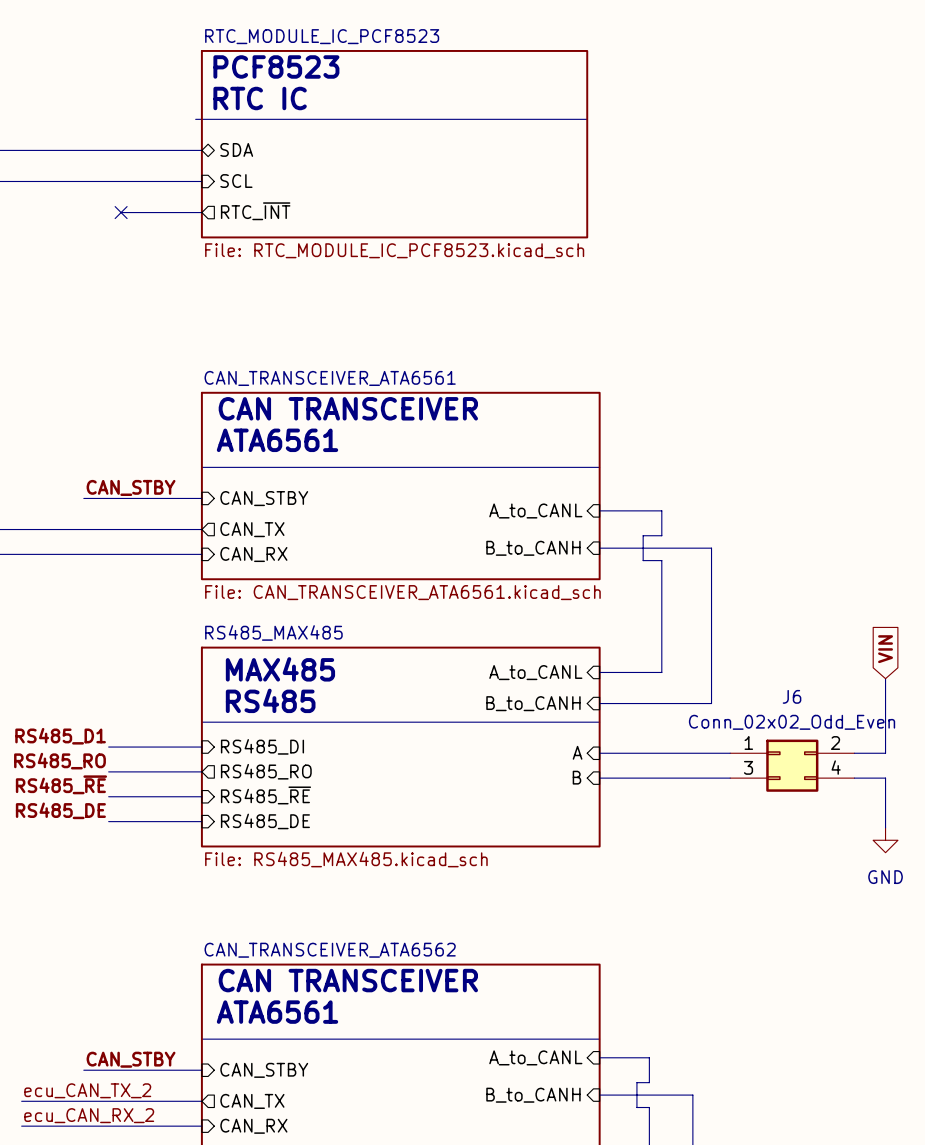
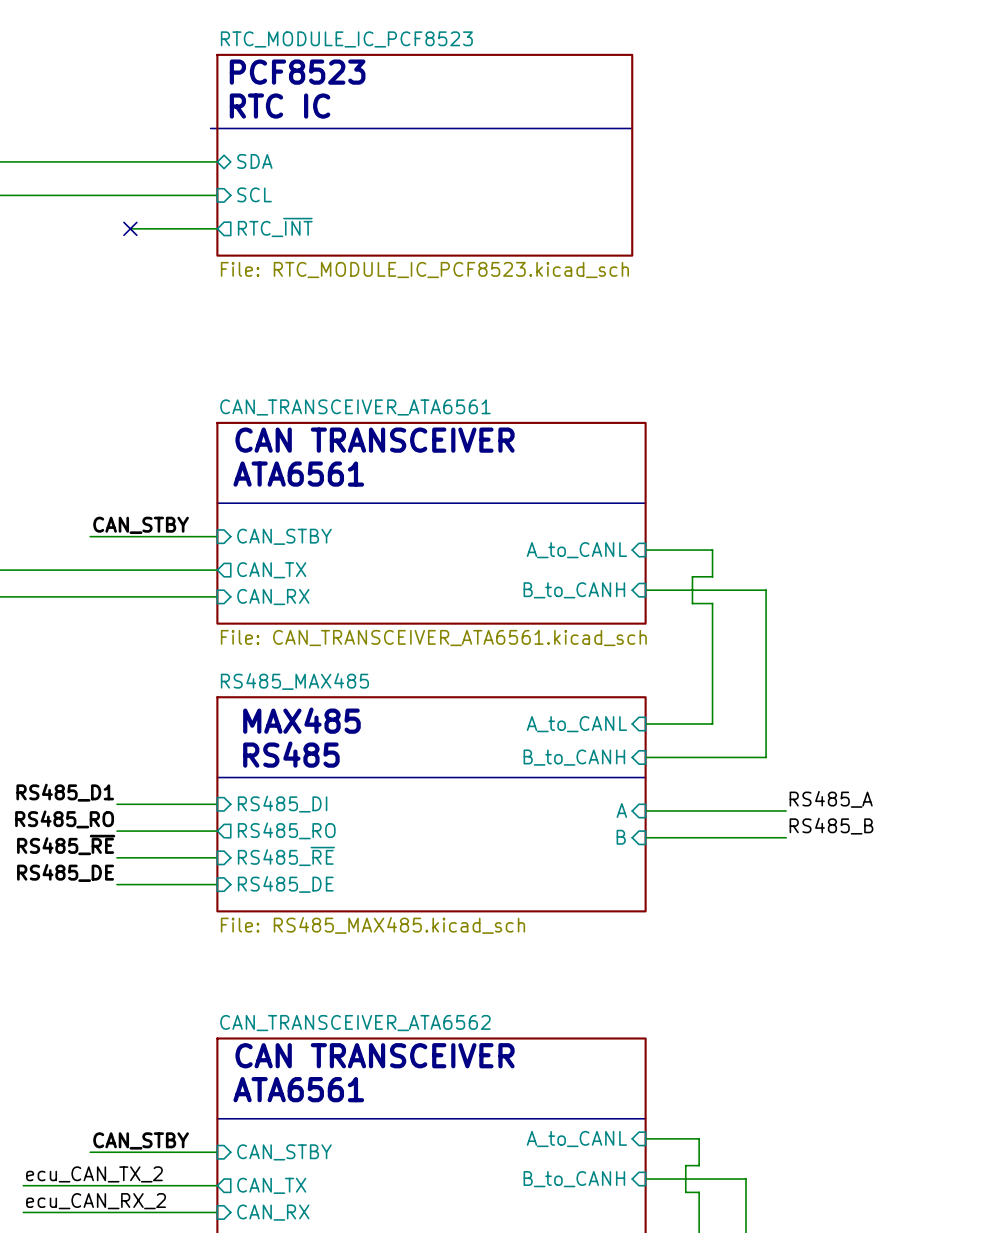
global label: VIN (885, 649) -> none
wire: (885, 678) (885, 753) (854, 753) -> none
label: none -> RS485_A (831, 799)
J6: Conn_02x02_Odd_Even (792, 765) -> none
label: none -> RS485_B (831, 826)
wire: (854, 778) (885, 778) (885, 827) -> none
power symbol: GND (885, 840) -> none

